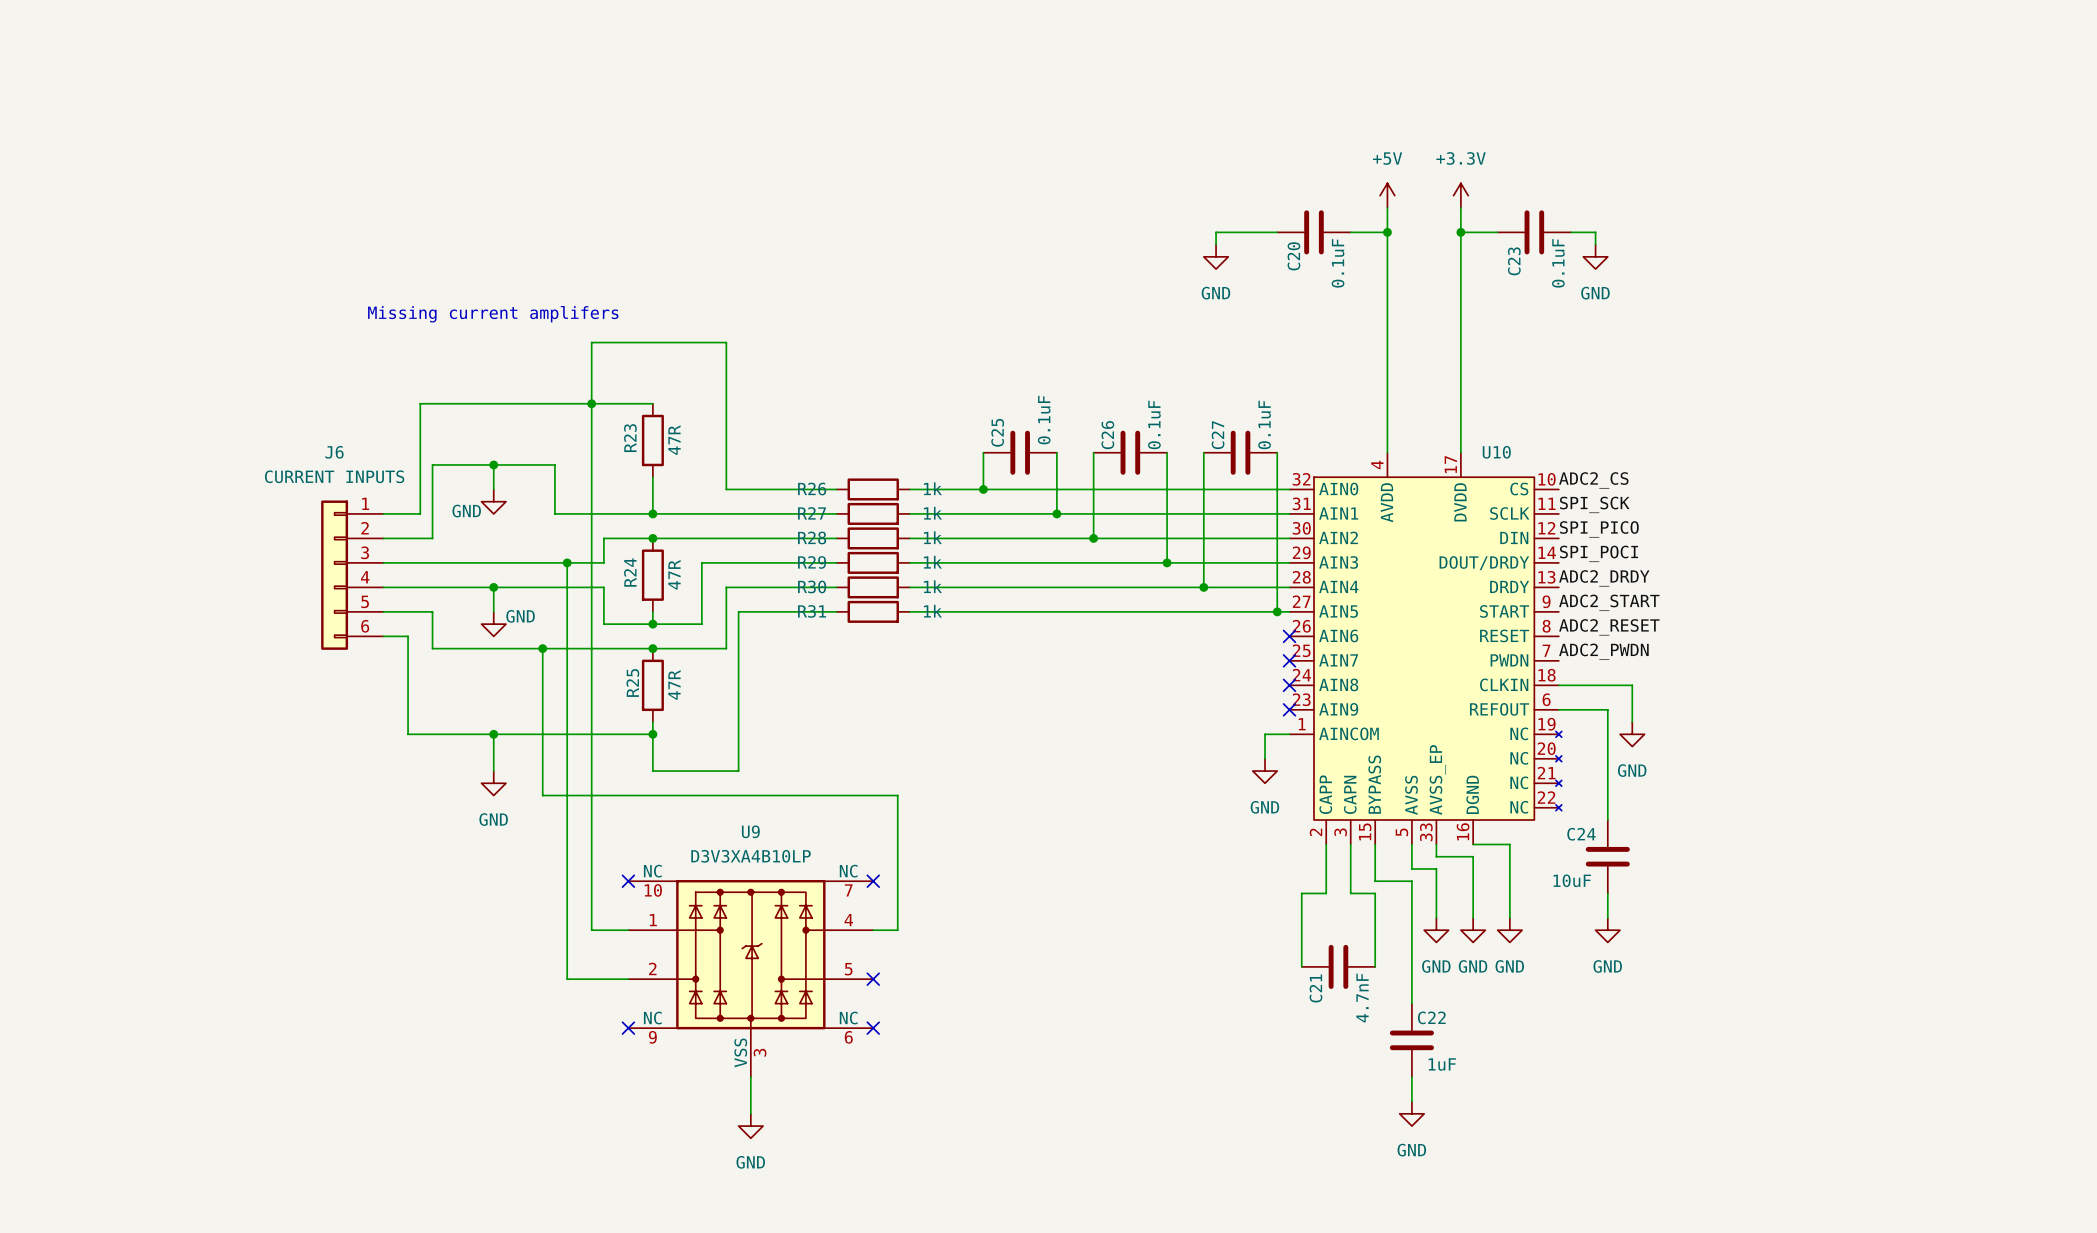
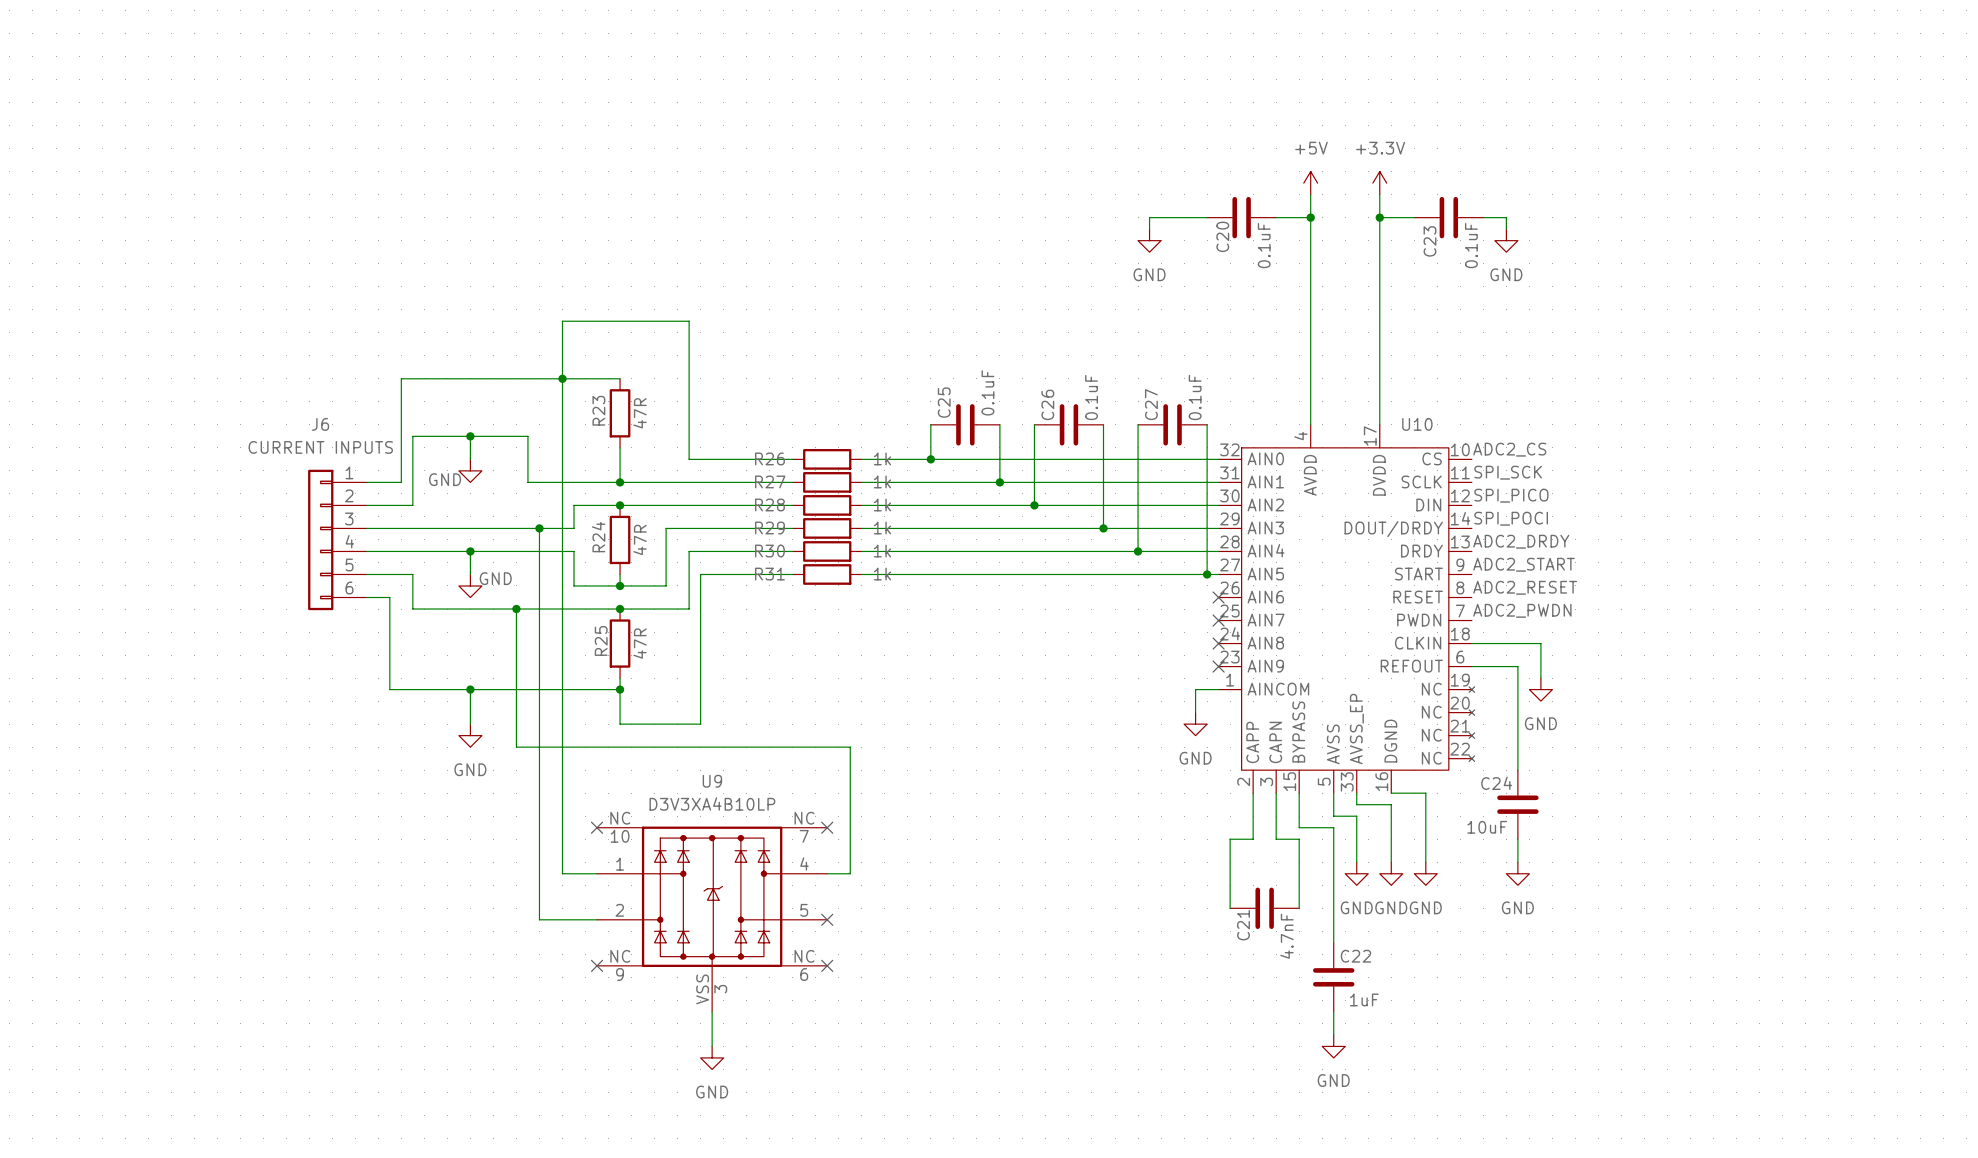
text: Missing current amplifers (493, 314) -> none
U10 symbol: [1289, 452, 1562, 845] -> [1218, 424, 1475, 794]

